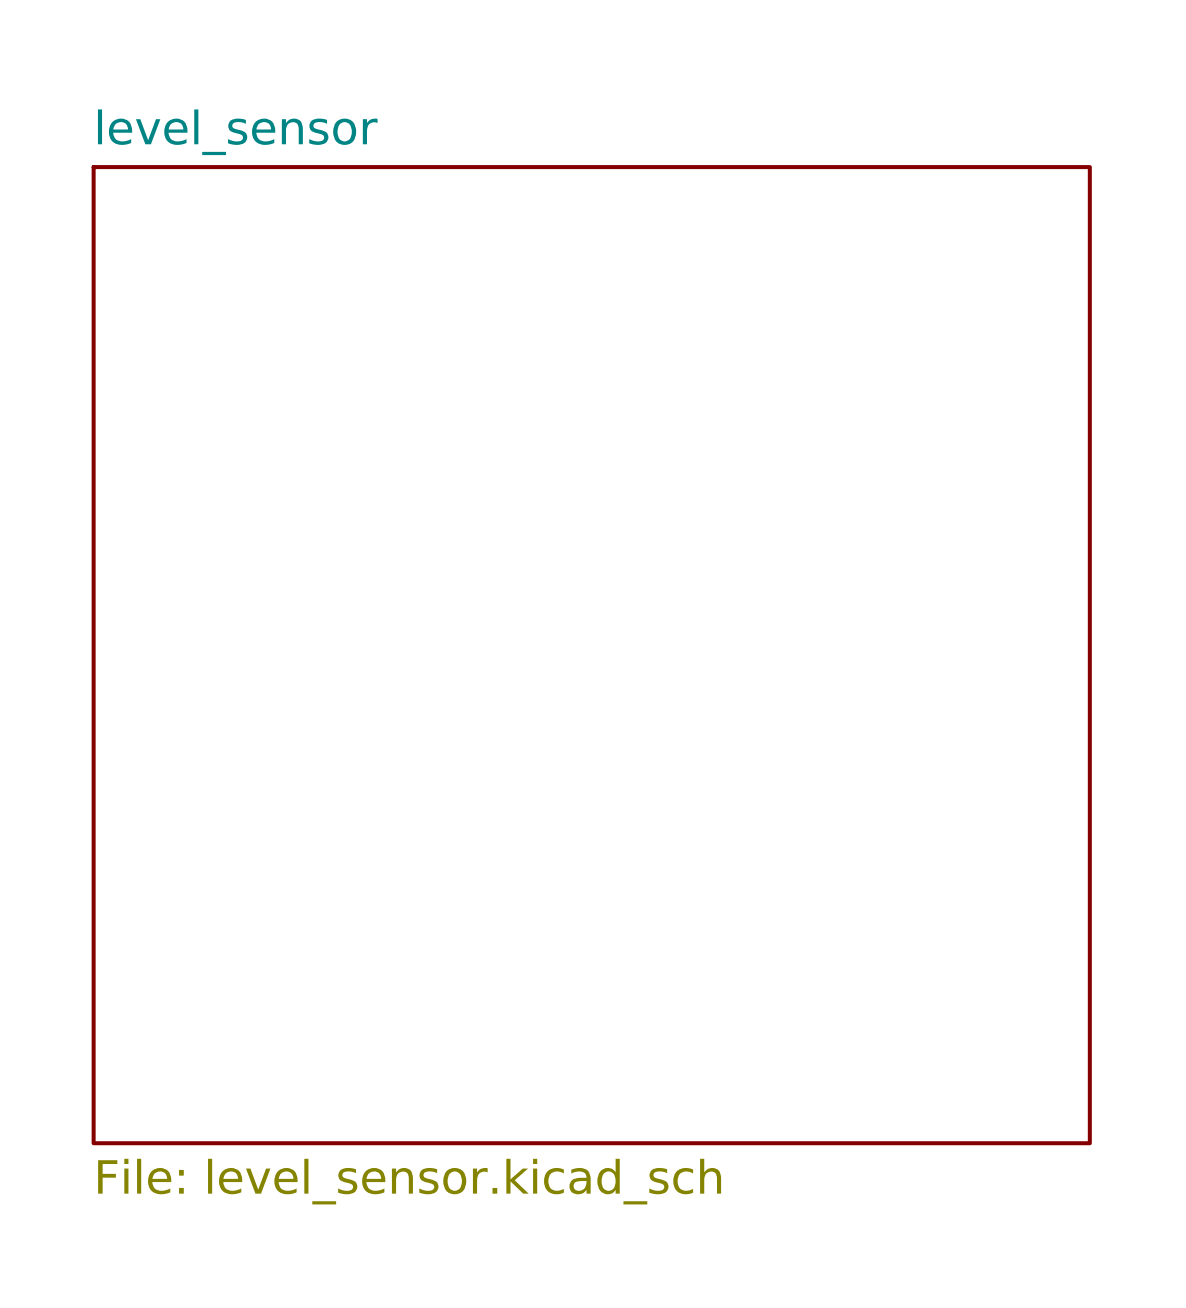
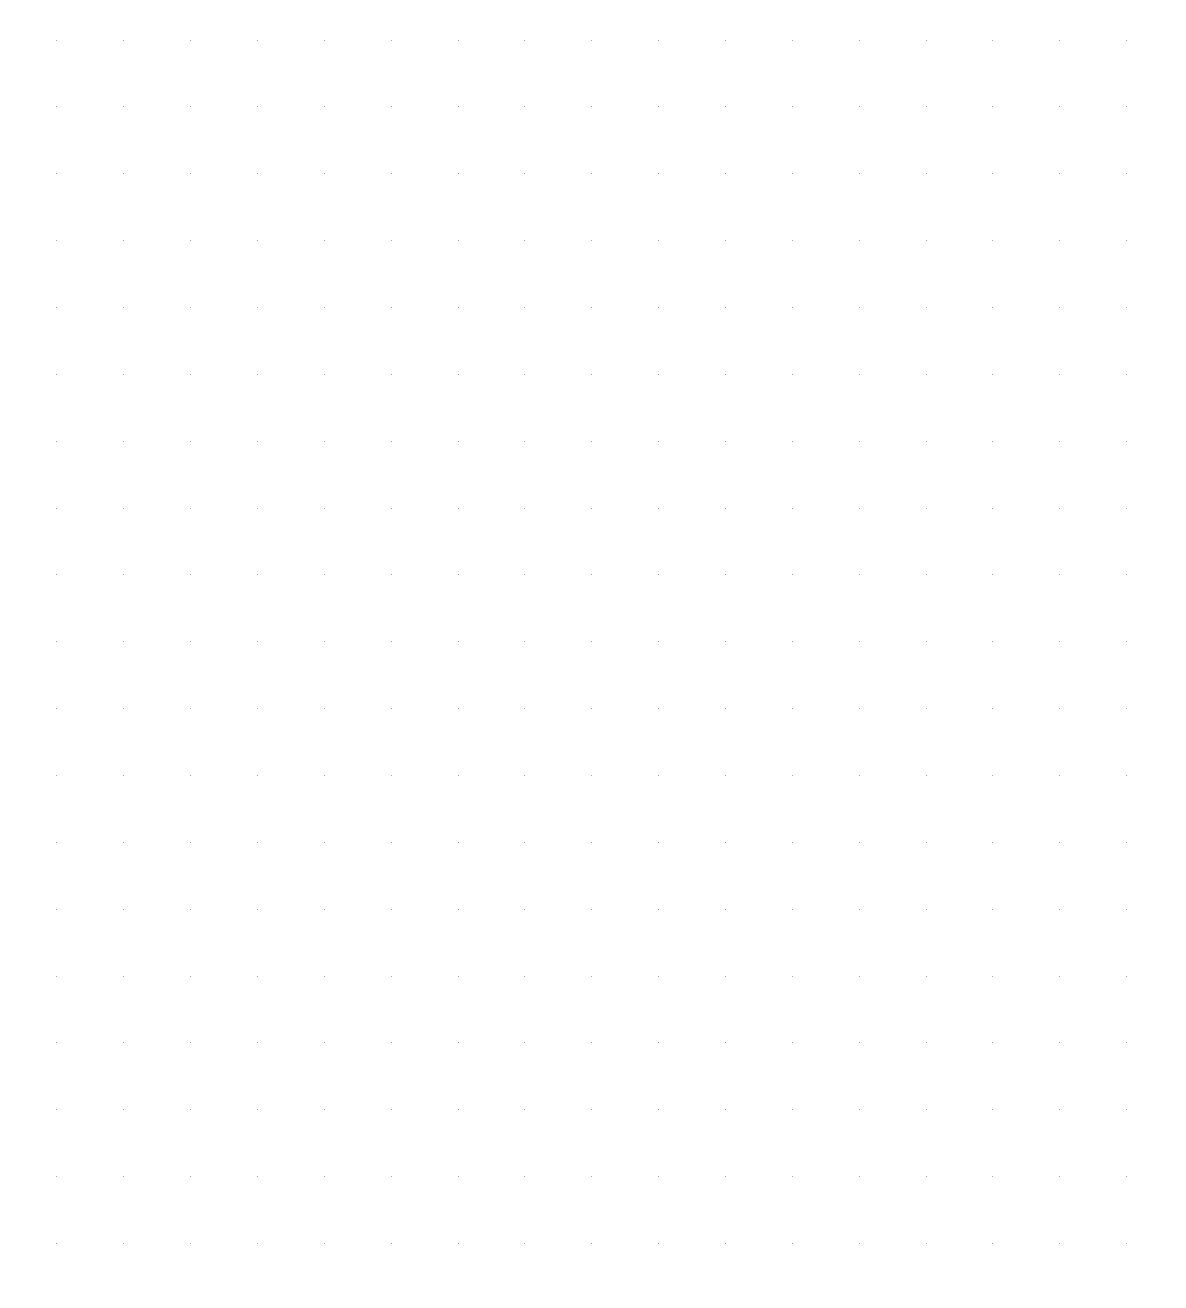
sheet level_sensor: File: level_sensor.kicad_sch (591, 655) -> none

